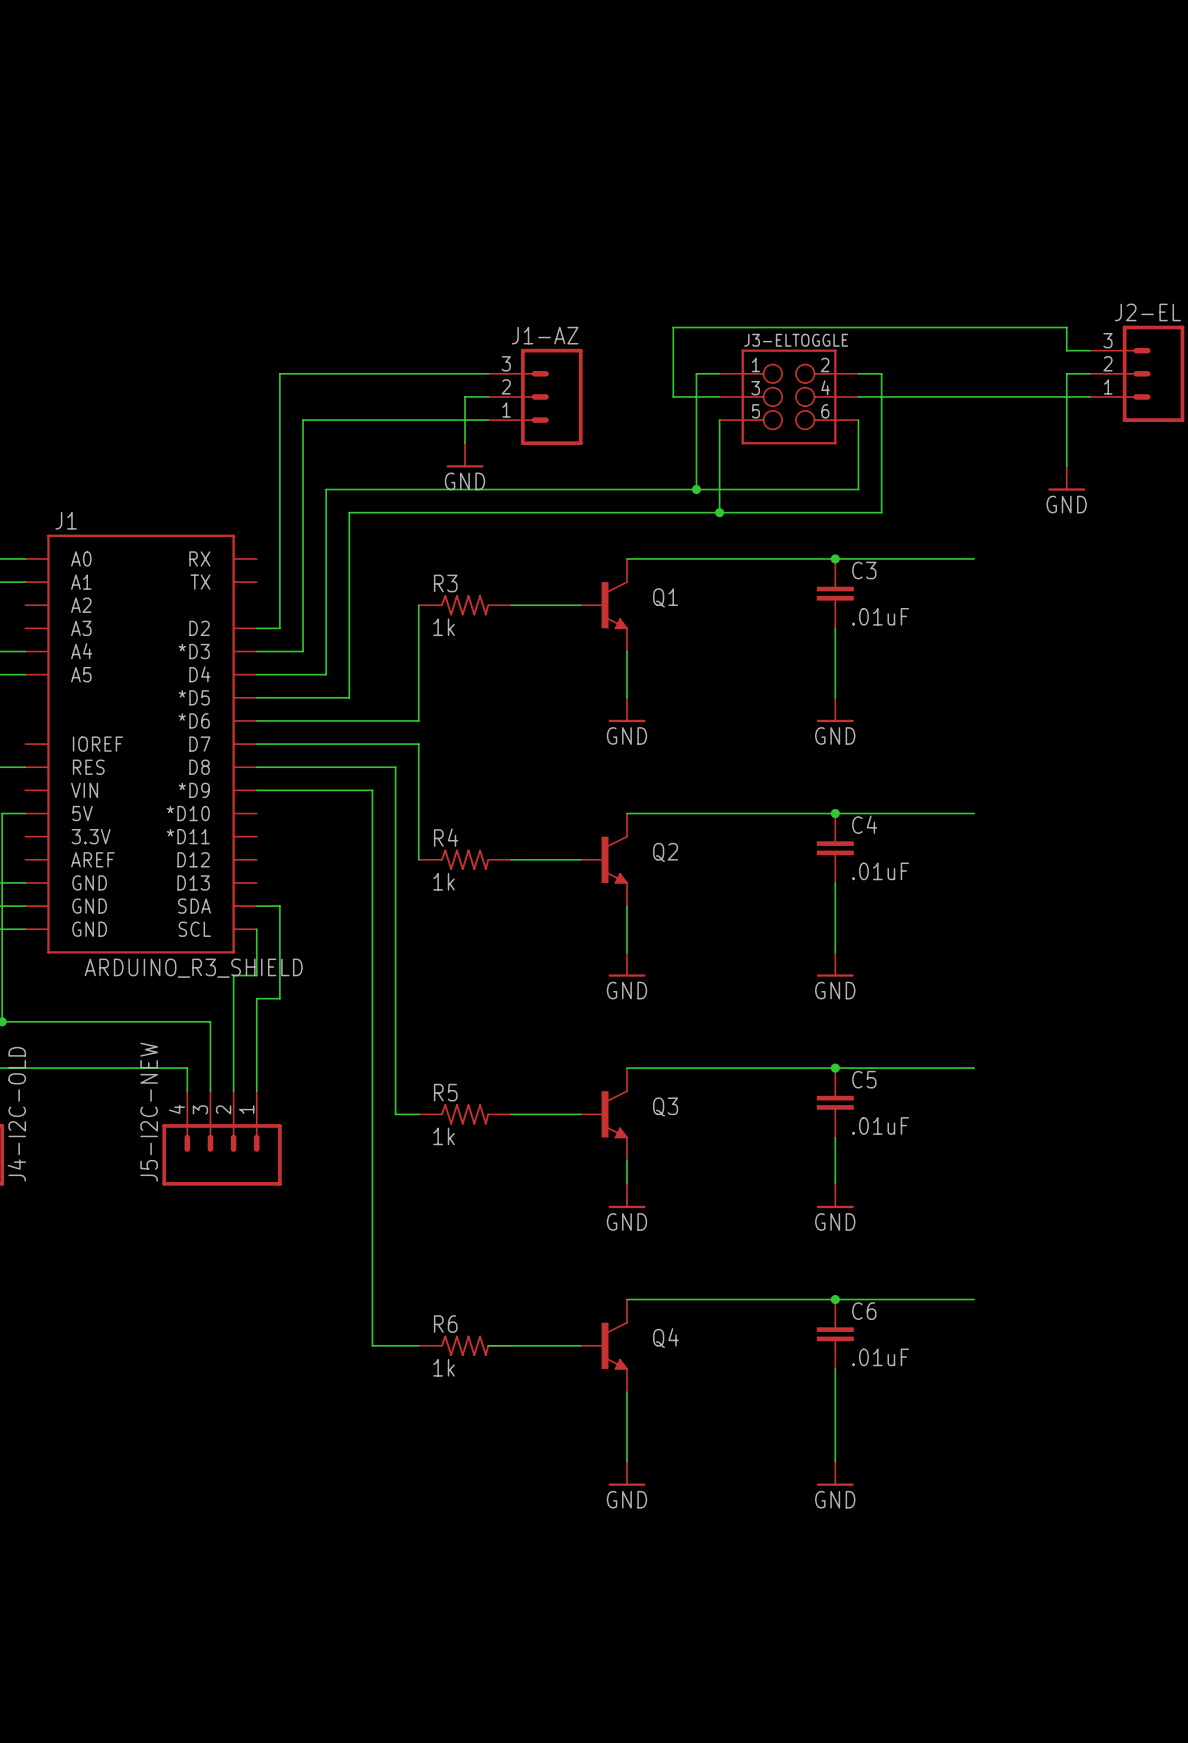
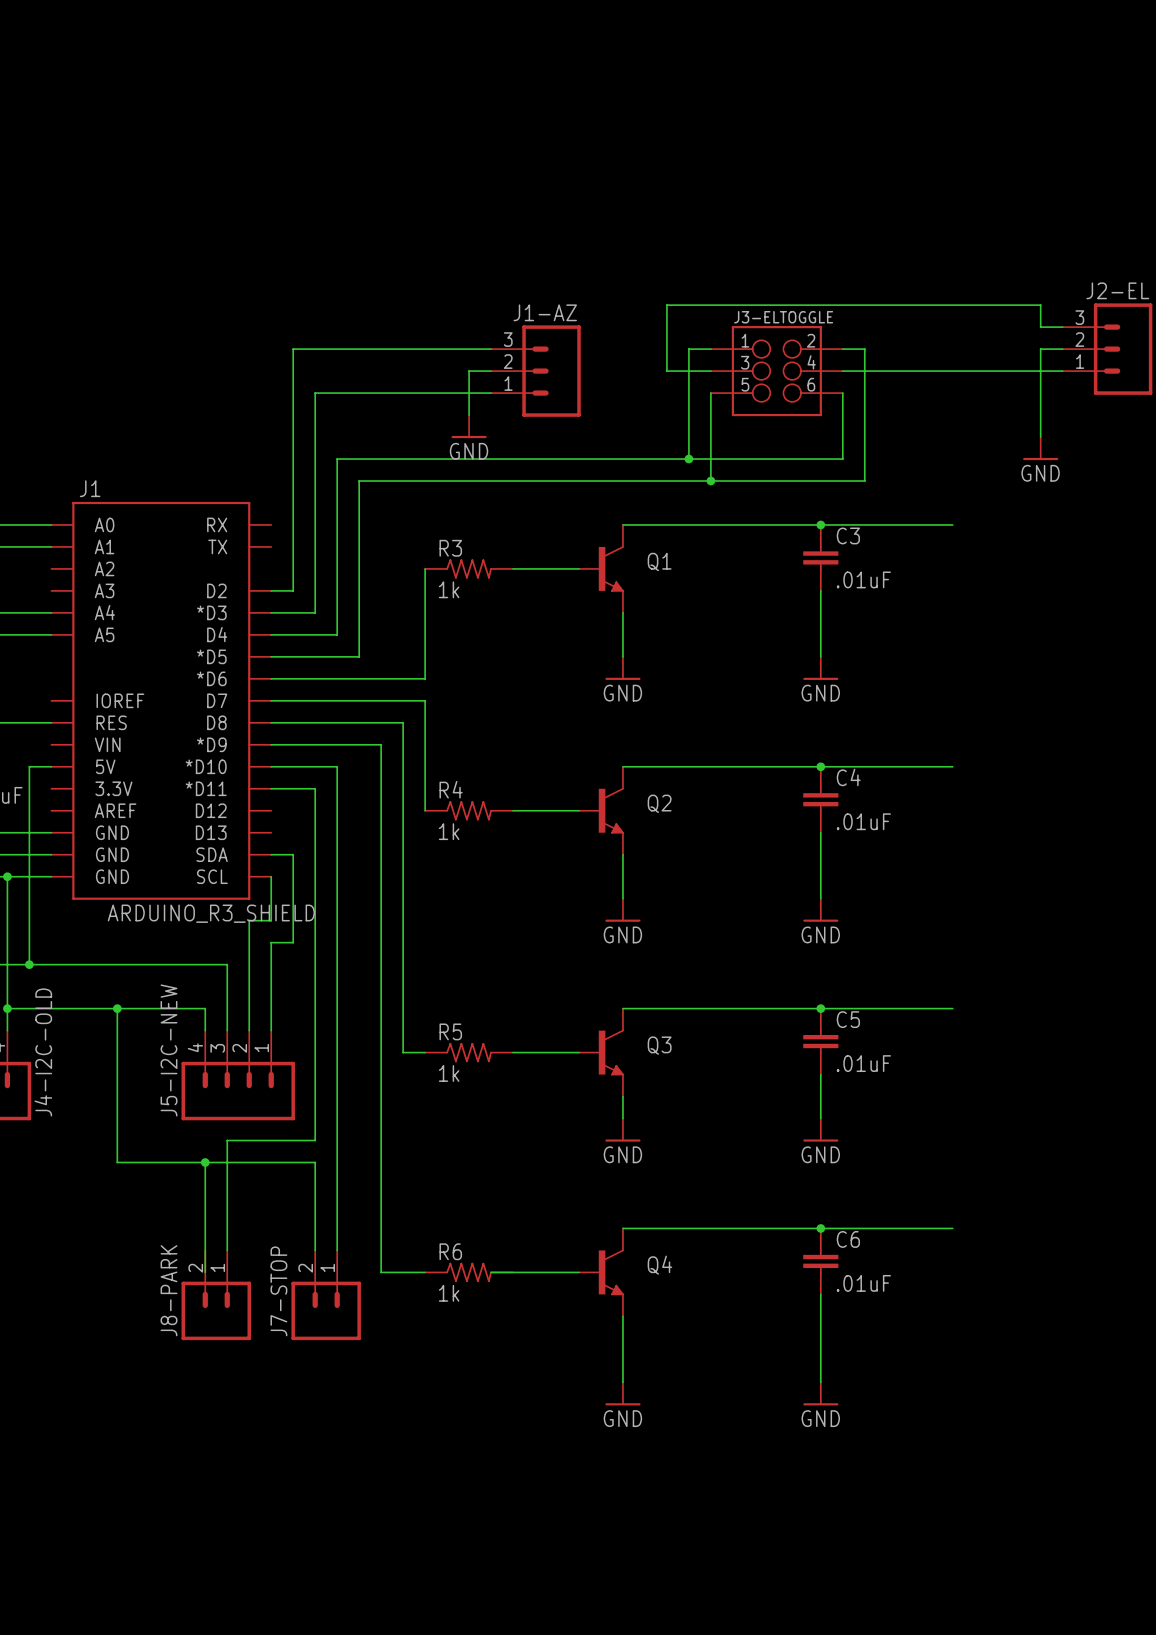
wire: none -> (271, 766) (337, 766) (337, 1250)
wire: none -> (271, 788) (315, 788) (315, 1140) (227, 1140) (227, 1250)
wire: none -> (117, 1008) (117, 1162) (315, 1162) (315, 1250)
junction: none -> (117, 1008)
wire: none -> (205, 1162) (205, 1272)
junction: none -> (205, 1162)
J8-PARK: none -> (216, 1295)
J7-STOP: none -> (326, 1295)

